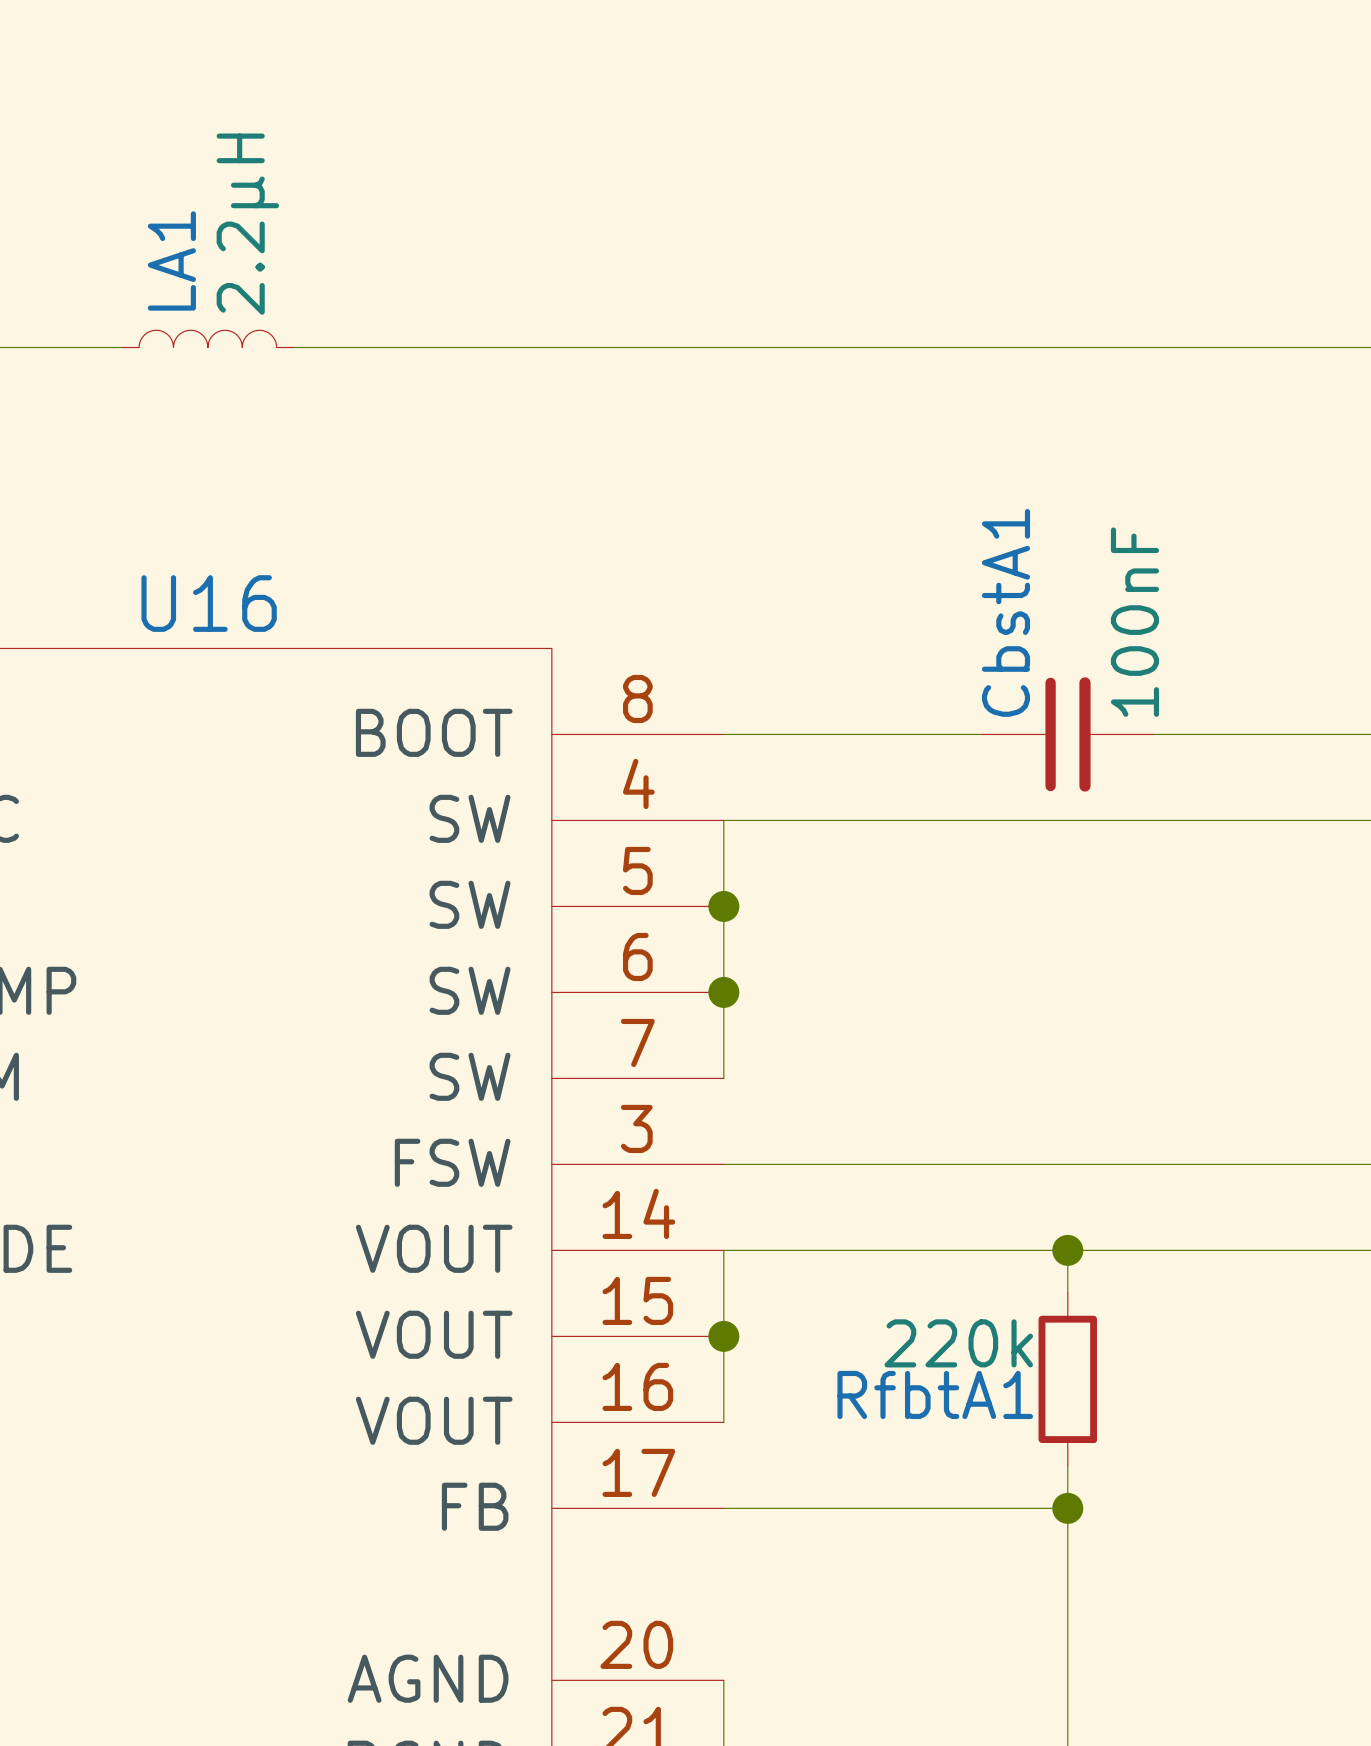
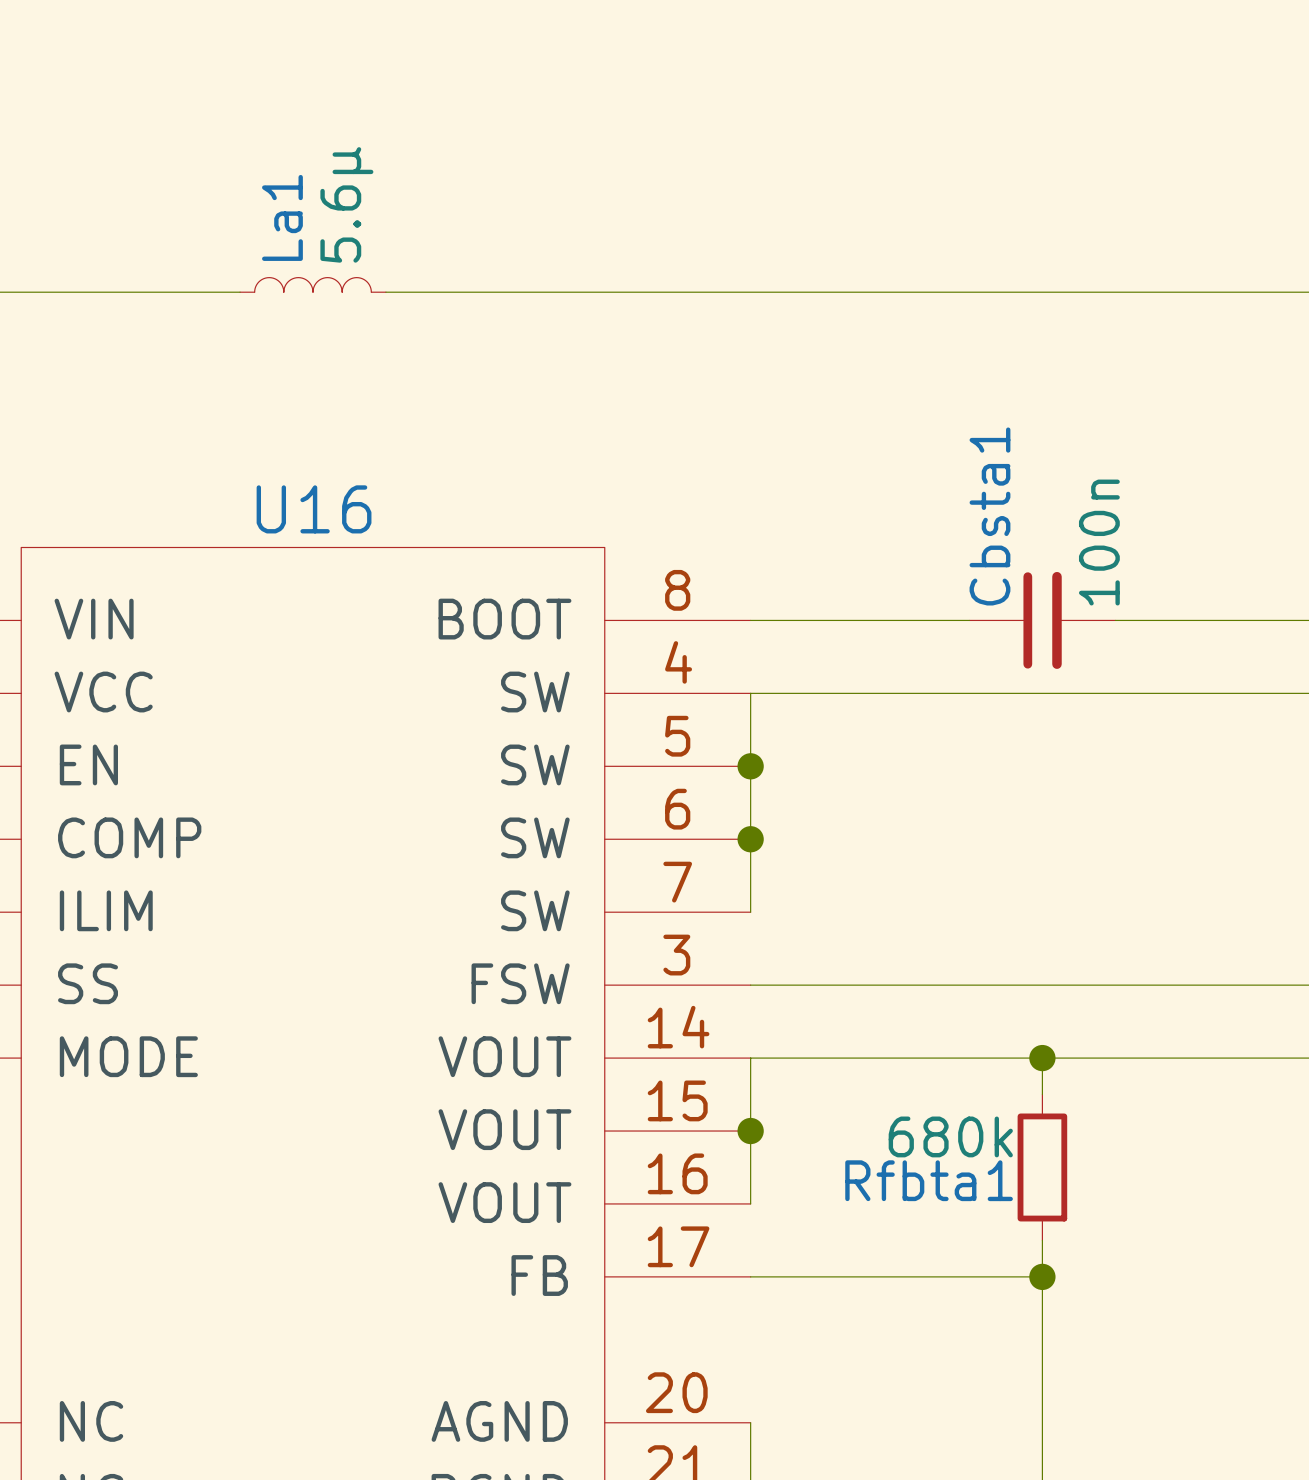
LA1 value: 2.2µH (247, 224) -> 5.6µ (346, 204)
LA1 name: LA1 (171, 260) -> La1 (282, 217)
CbstA1 name: CbstA1 (1005, 612) -> Cbsta1 (989, 516)
CbstA1 value: 100nF (1134, 622) -> 100n (1099, 542)
RfbtA1 value: 220k (958, 1343) -> 680k (950, 1136)
RfbtA1 name: RfbtA1 (935, 1394) -> Rfbta1 (929, 1180)

